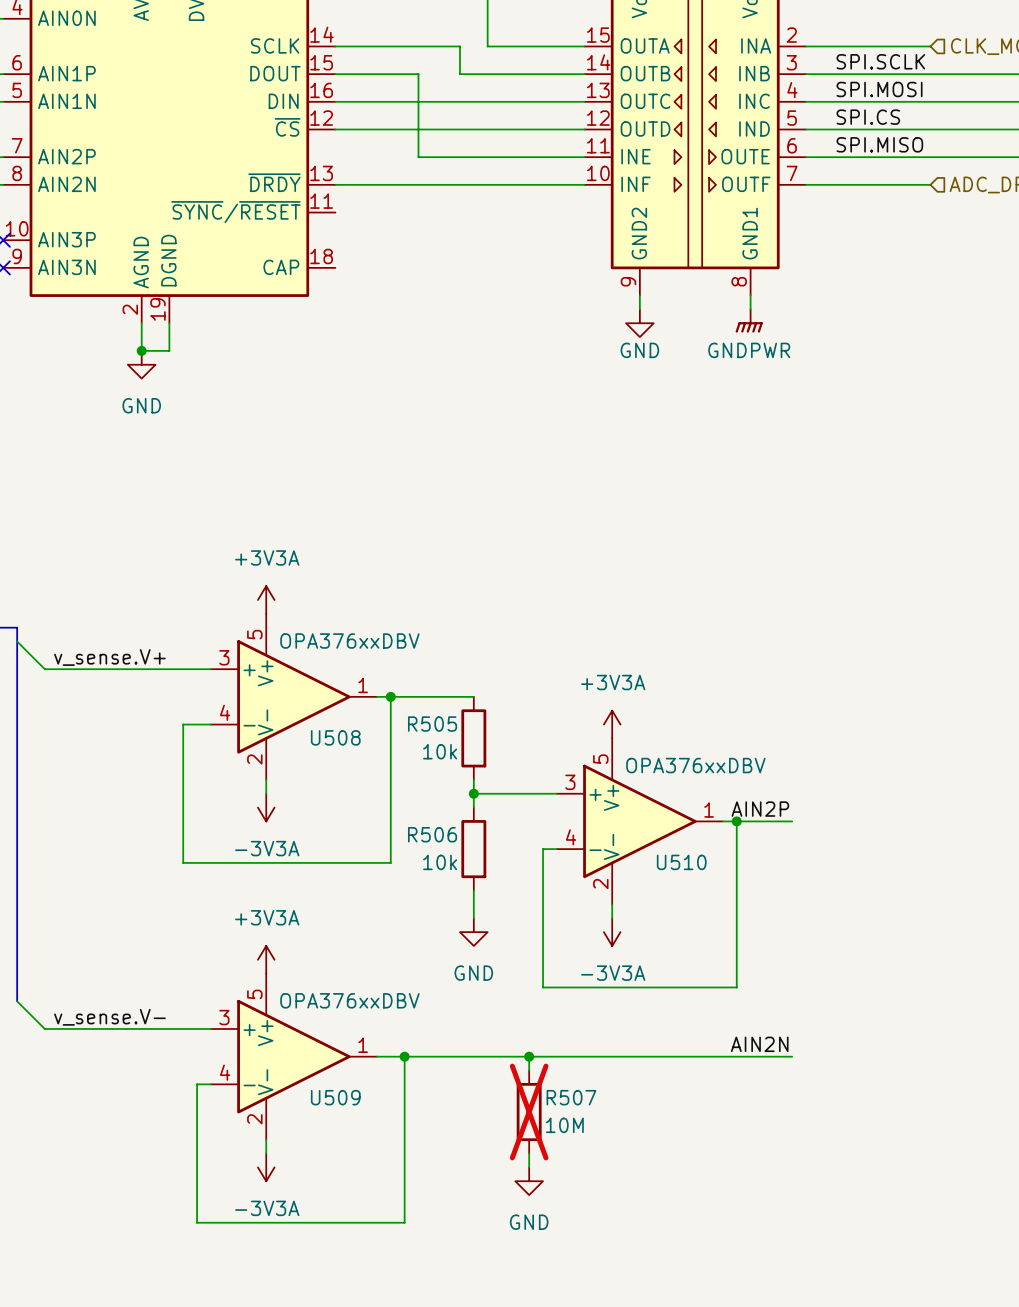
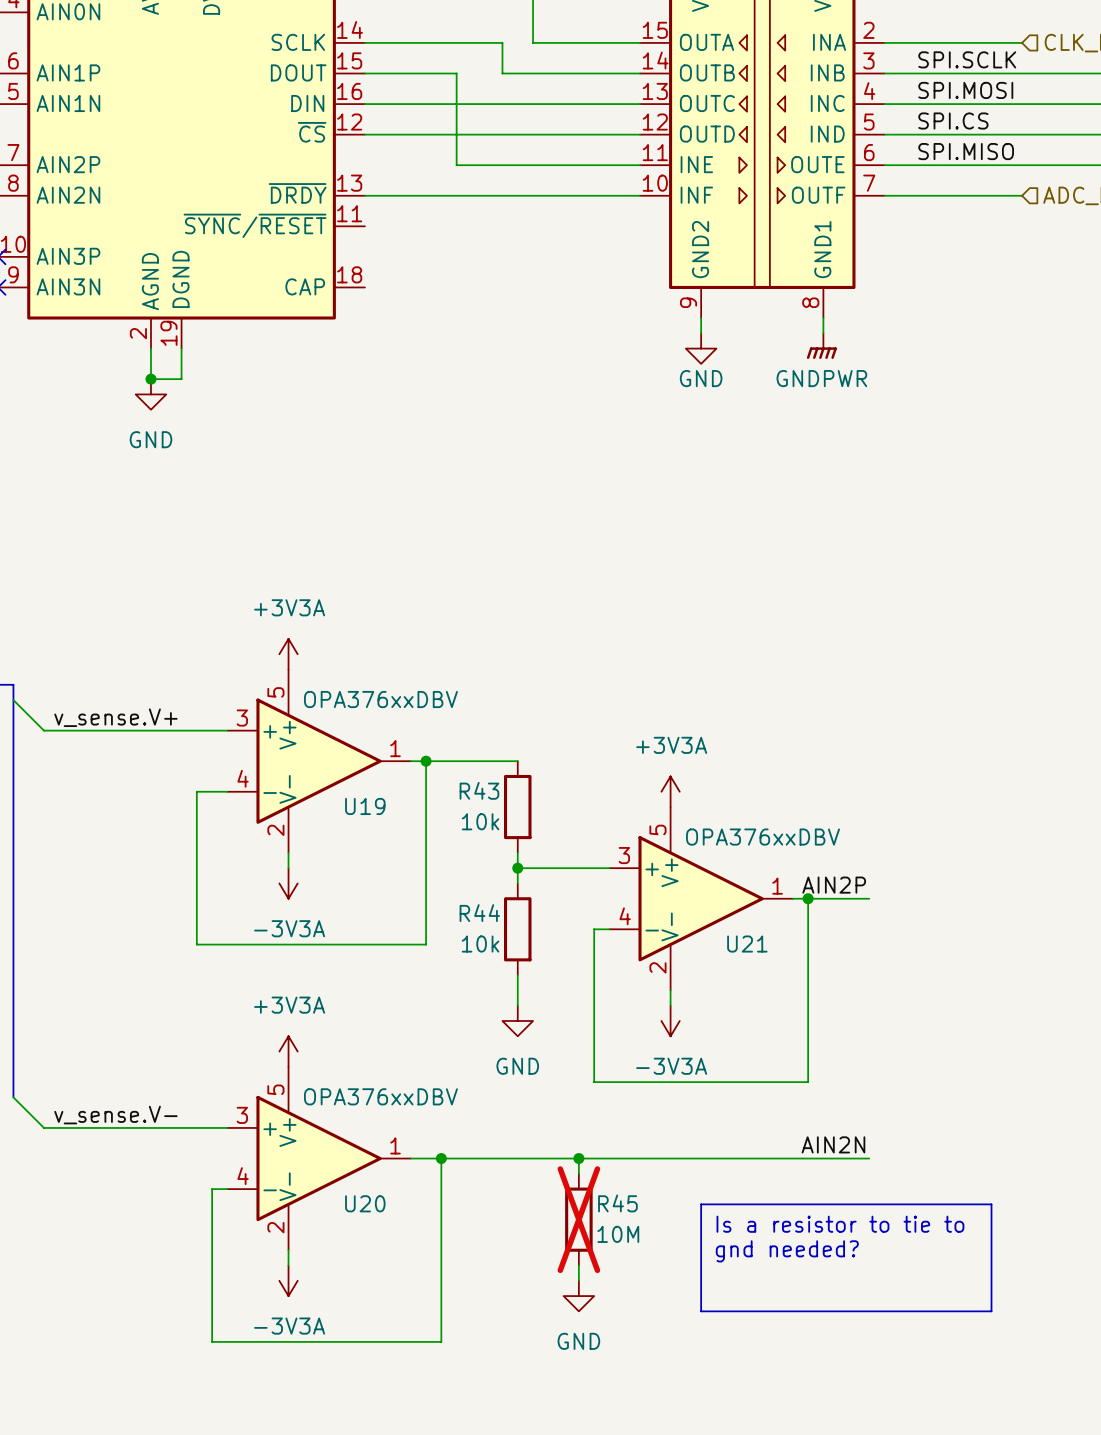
R505 name: R505 (432, 724) -> R43 (479, 790)
U508 name: U508 (335, 737) -> U19 (365, 806)
R506 name: R506 (432, 834) -> R44 (479, 913)
U510 name: U510 (681, 862) -> U21 (747, 944)
U509 name: U509 (335, 1097) -> U20 (365, 1203)
R507 name: R507 (571, 1097) -> R45 (617, 1203)
line: none -> (701, 1204) (991, 1204) (991, 1311) (701, 1311) (701, 1204)
text: none -> Is a resistor to tie to (840, 1224)
text: none -> gnd needed? (787, 1251)

